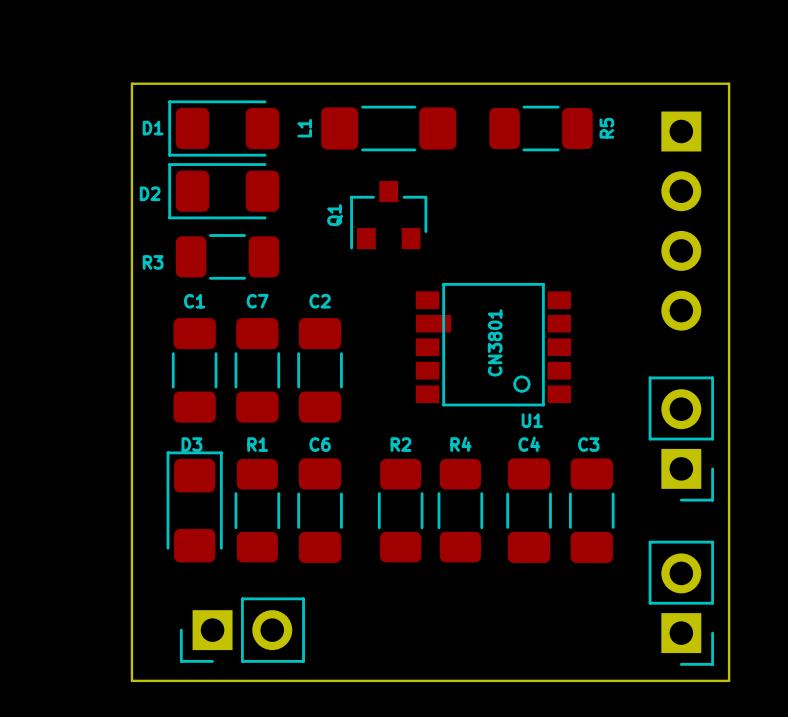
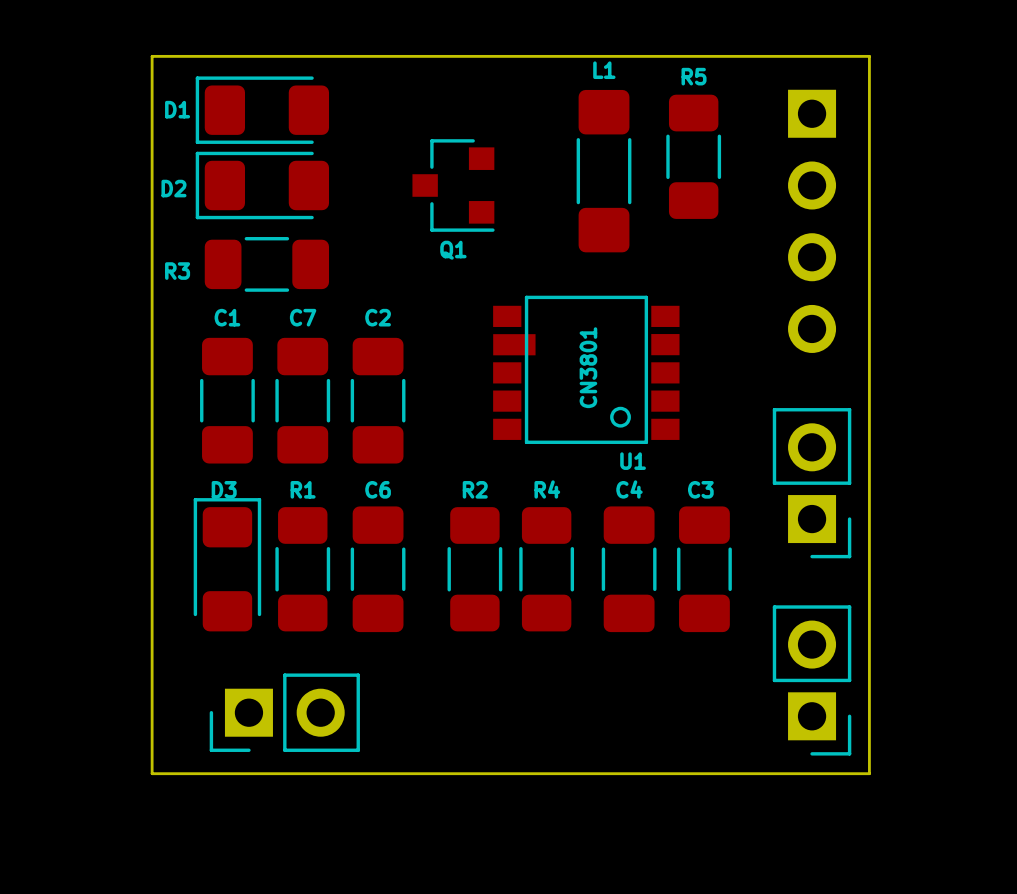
L1 rotation: 0° (388, 128) -> 90° clockwise (604, 171)
L1 position: (388, 128) -> (604, 171)
R5 rotation: 0° (541, 128) -> 90° clockwise (693, 156)
R5 name position: R5 (606, 128) -> R5 (694, 76)
Q1 rotation: 0° (388, 215) -> 90° counterclockwise (453, 185)

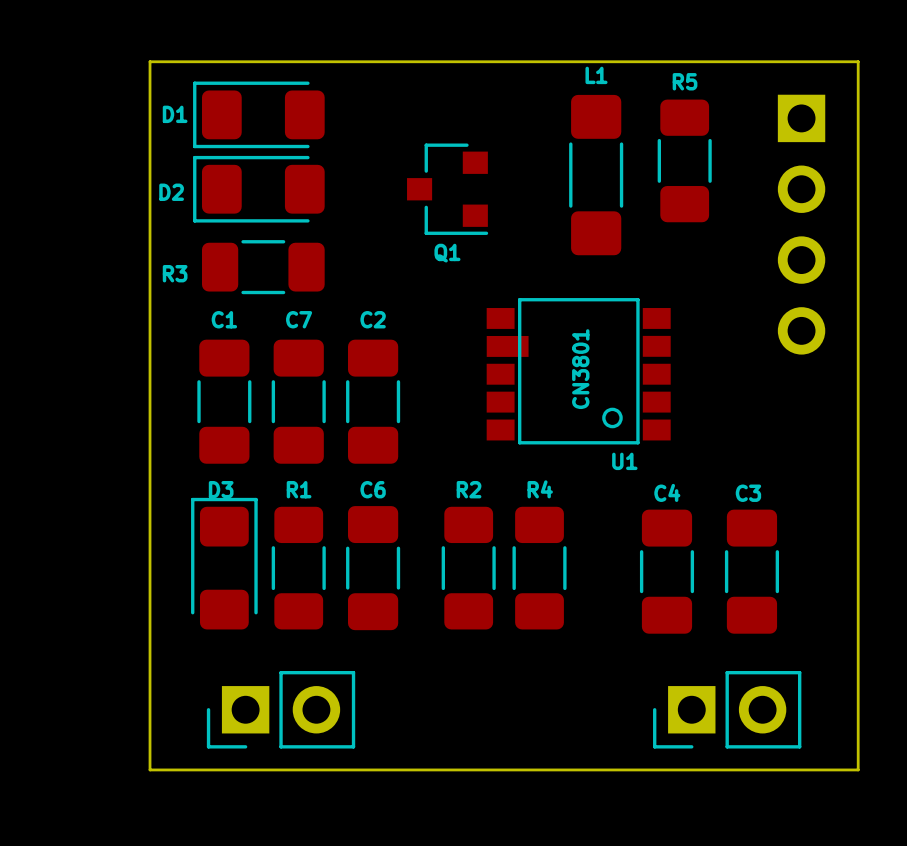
part: (812, 483) -> none
C4 position: (629, 569) -> (666, 571)
C3 position: (704, 569) -> (751, 571)
part rotation: 0° (812, 680) -> 90° clockwise (727, 709)

